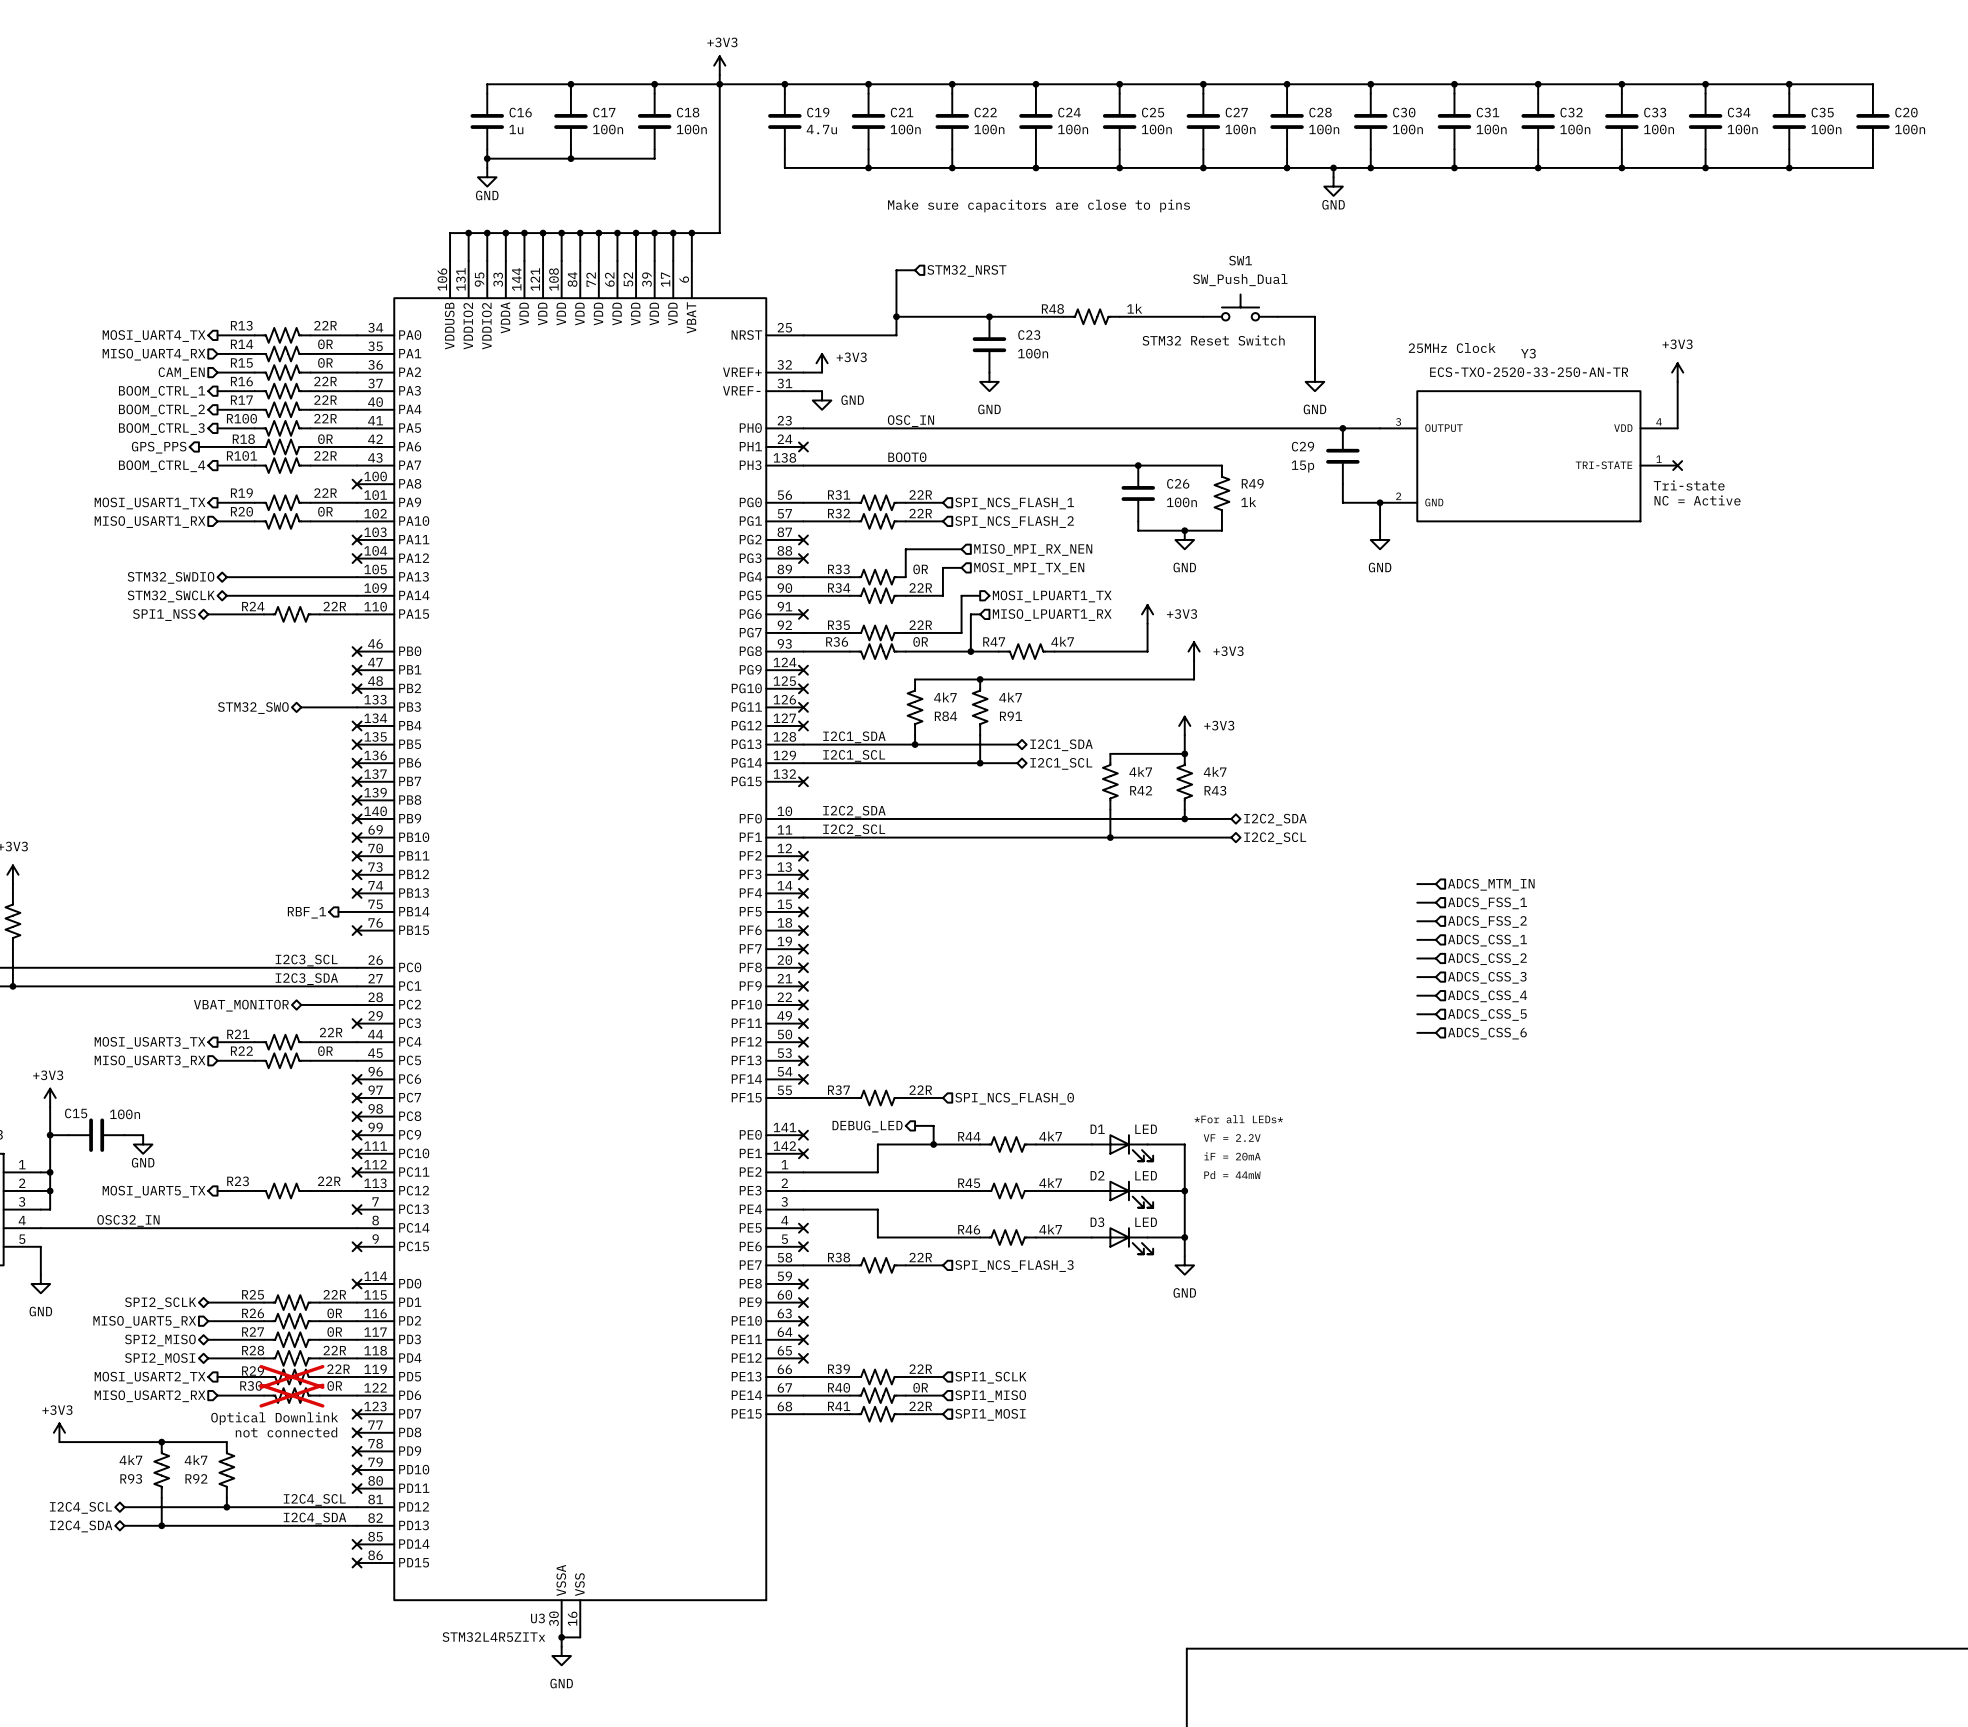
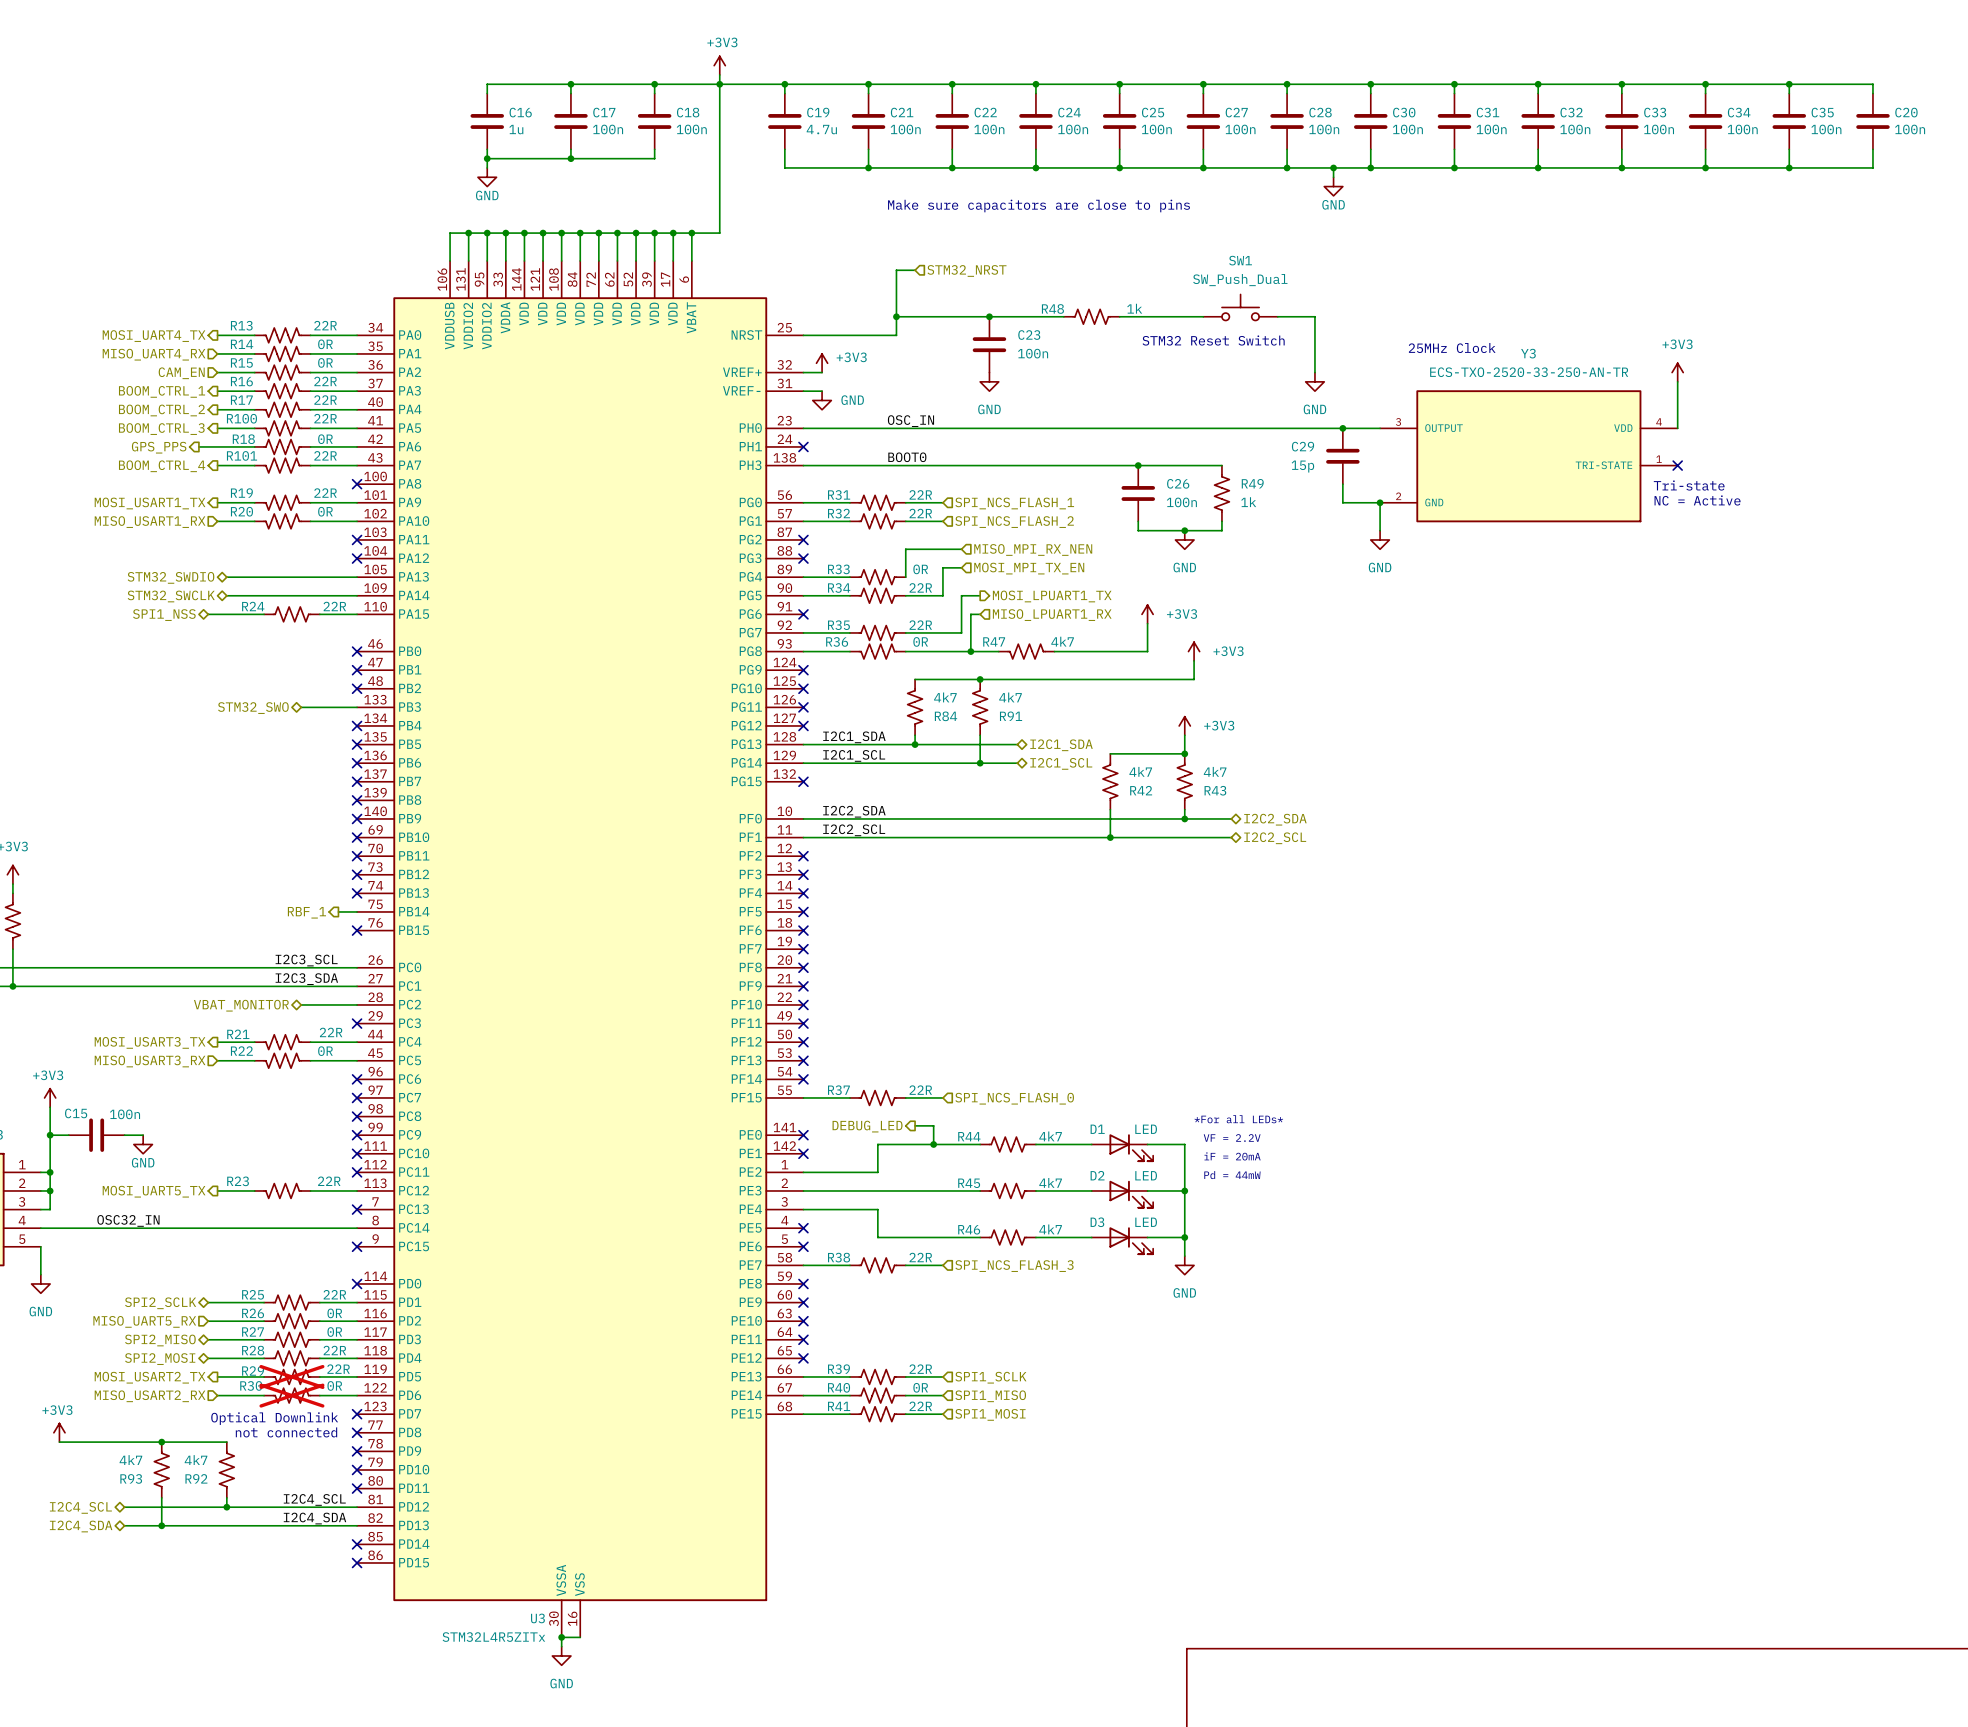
wire: (1417, 884) (1435, 884) -> none
hierarchical label: ADCS_MTM_IN (1491, 884) -> none
wire: (1417, 902) (1435, 902) -> none
hierarchical label: ADCS_FSS_1 (1487, 903) -> none
wire: (1417, 921) (1435, 921) -> none
hierarchical label: ADCS_FSS_2 (1487, 921) -> none
wire: (1417, 939) (1435, 939) -> none
hierarchical label: ADCS_CSS_1 (1487, 940) -> none
wire: (1417, 958) (1435, 958) -> none
hierarchical label: ADCS_CSS_2 (1487, 959) -> none
wire: (1417, 977) (1435, 977) -> none
hierarchical label: ADCS_CSS_3 (1487, 977) -> none
wire: (1417, 995) (1435, 995) -> none
hierarchical label: ADCS_CSS_4 (1487, 996) -> none
wire: (1417, 1014) (1435, 1014) -> none
hierarchical label: ADCS_CSS_5 (1487, 1014) -> none
wire: (1417, 1032) (1435, 1032) -> none
hierarchical label: ADCS_CSS_6 (1487, 1033) -> none

